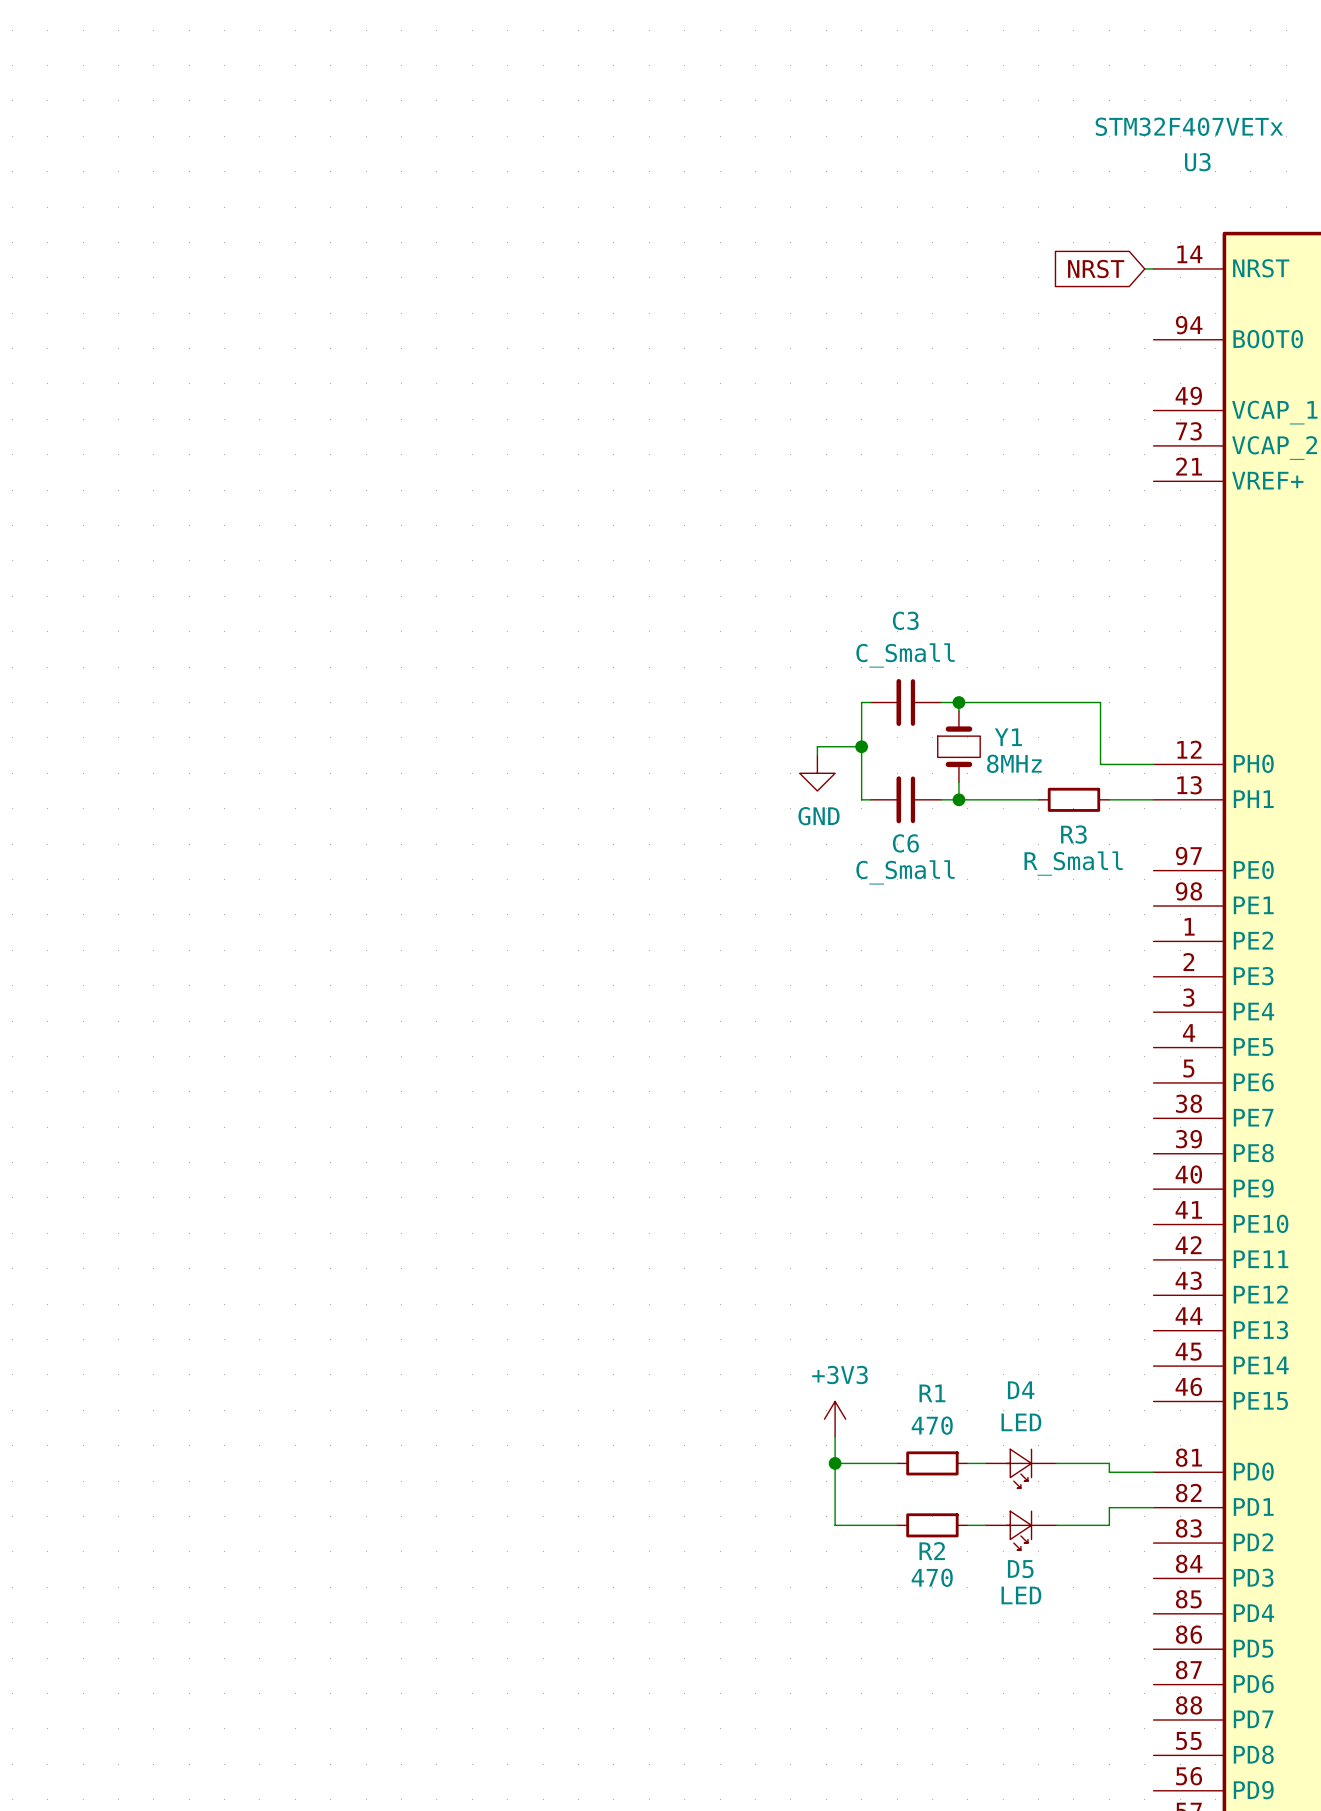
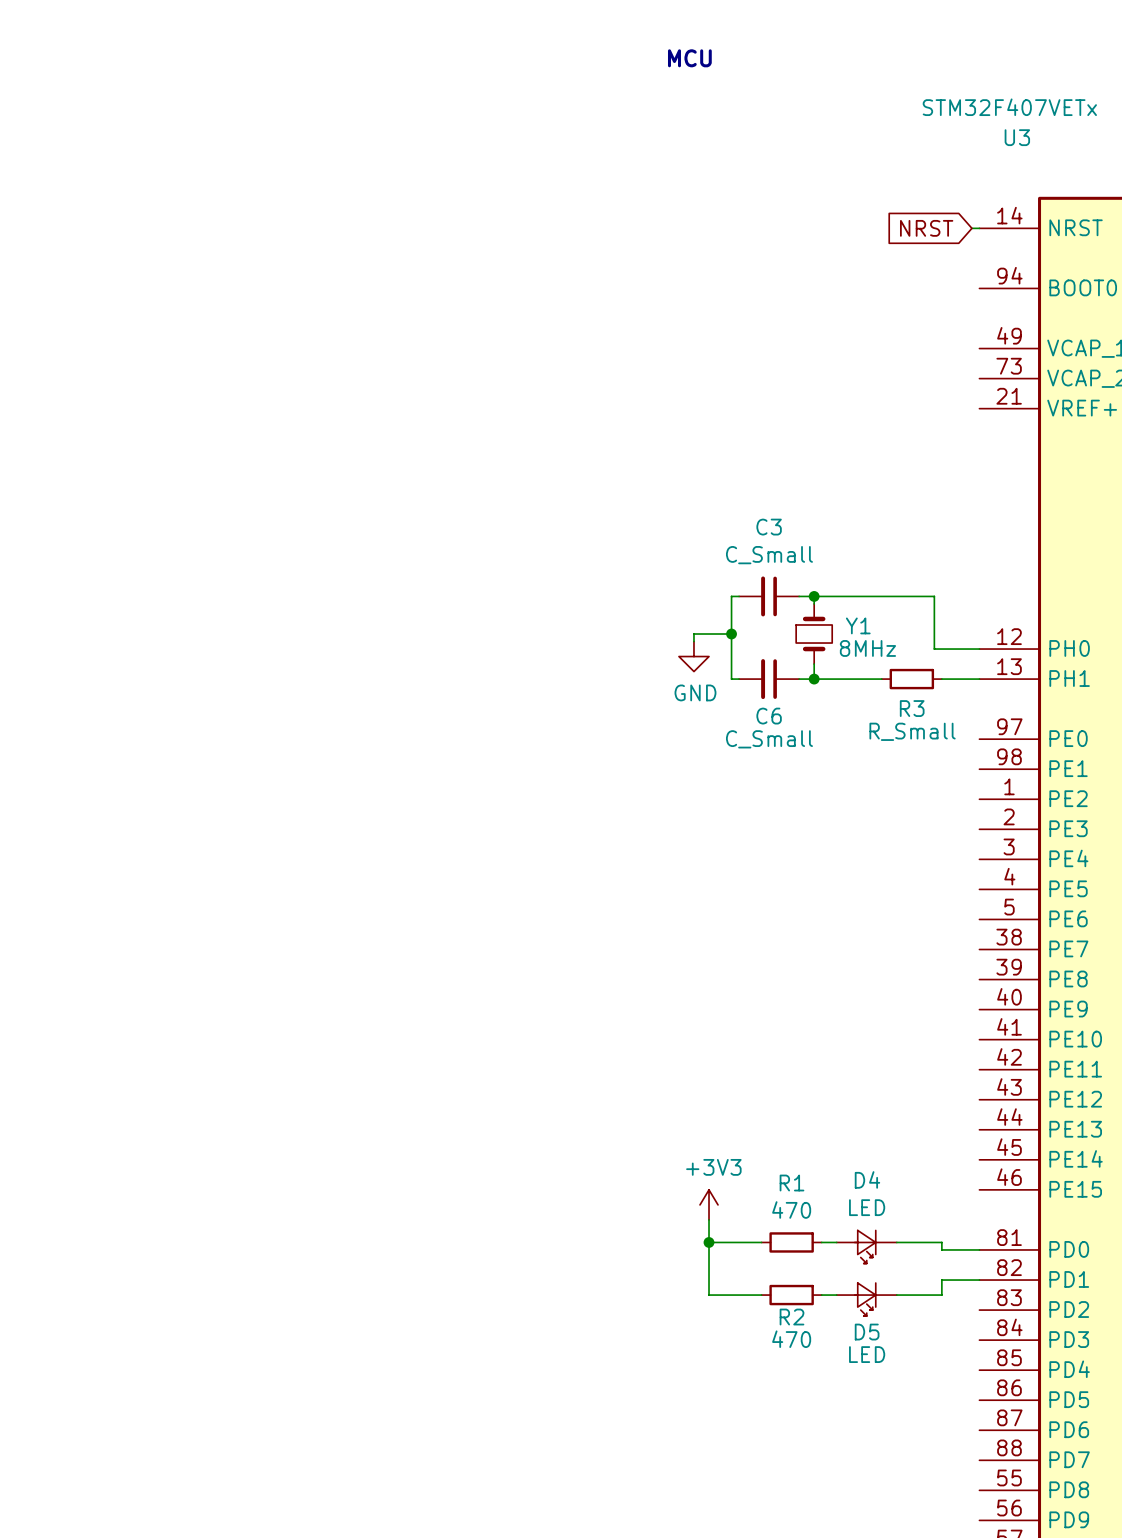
text: none -> MCU (689, 58)

